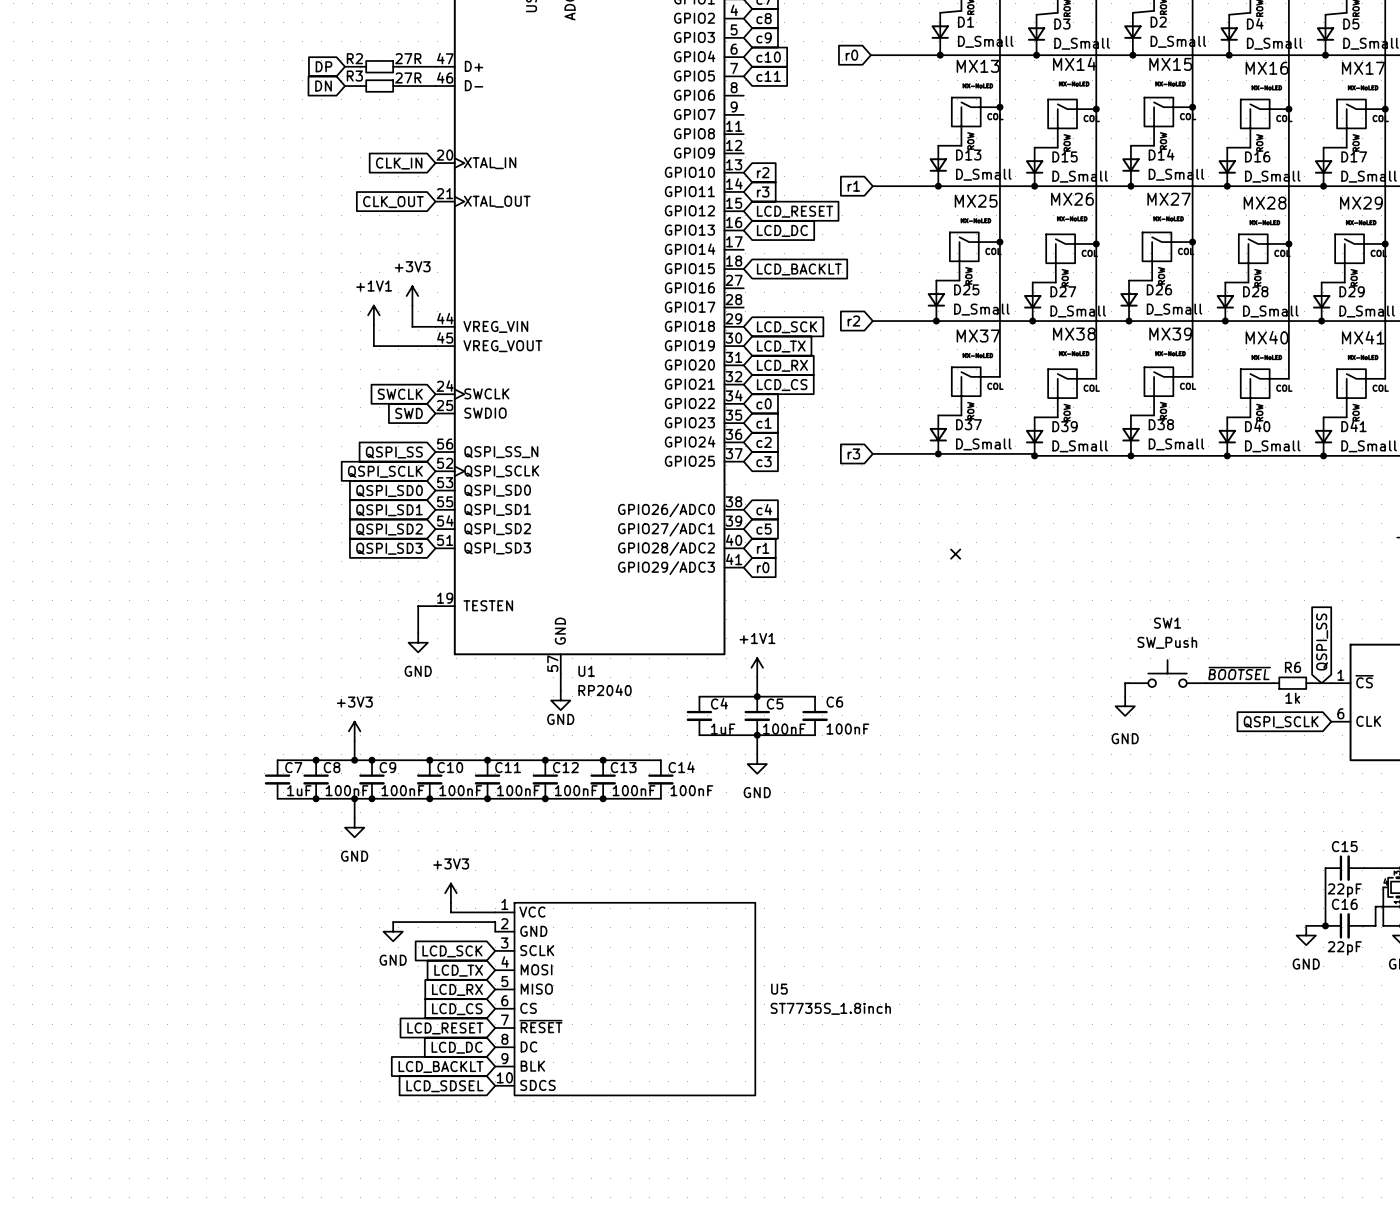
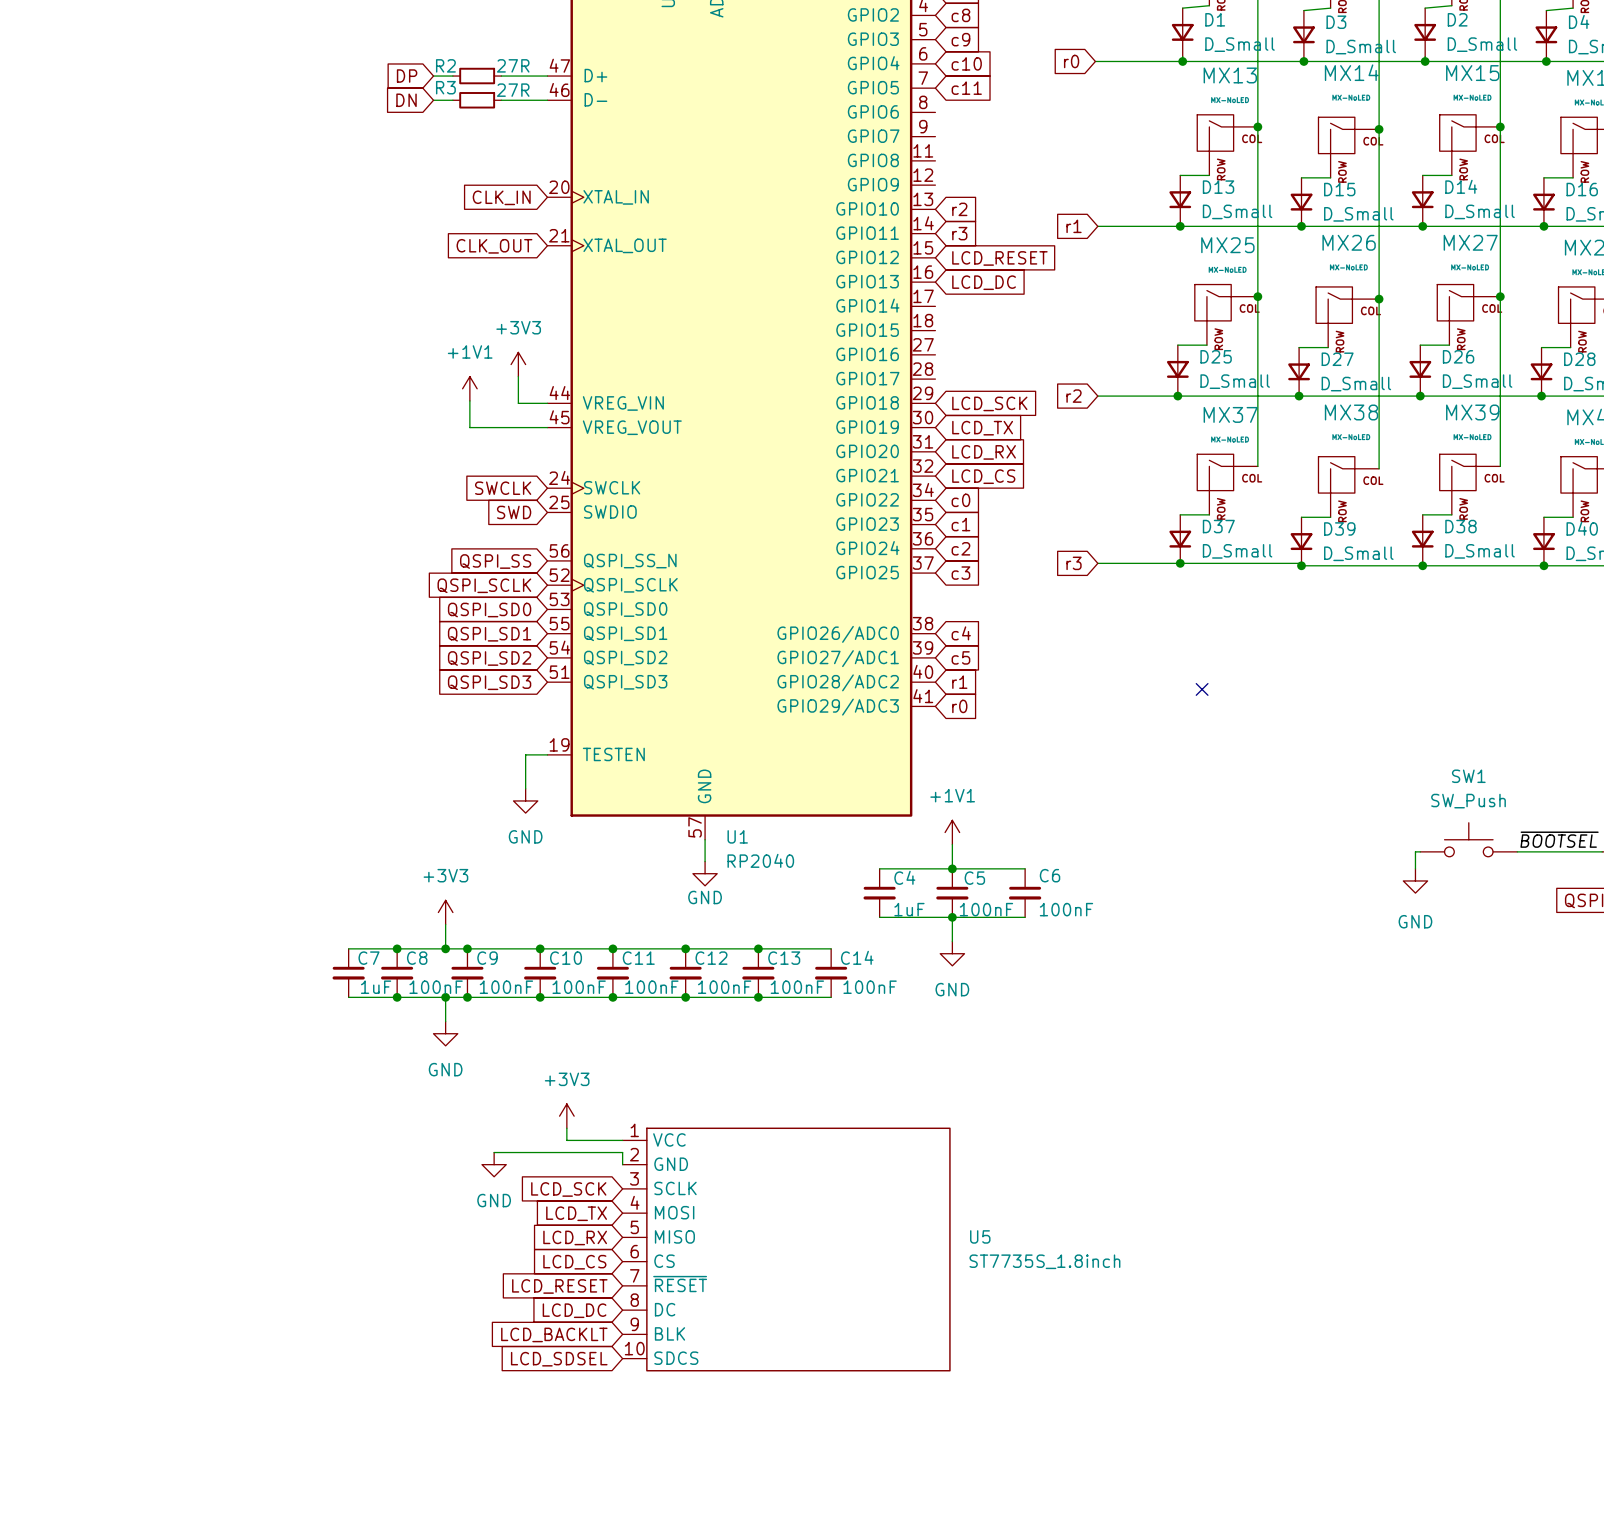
global label: LCD_BACKLT (799, 269) -> none

